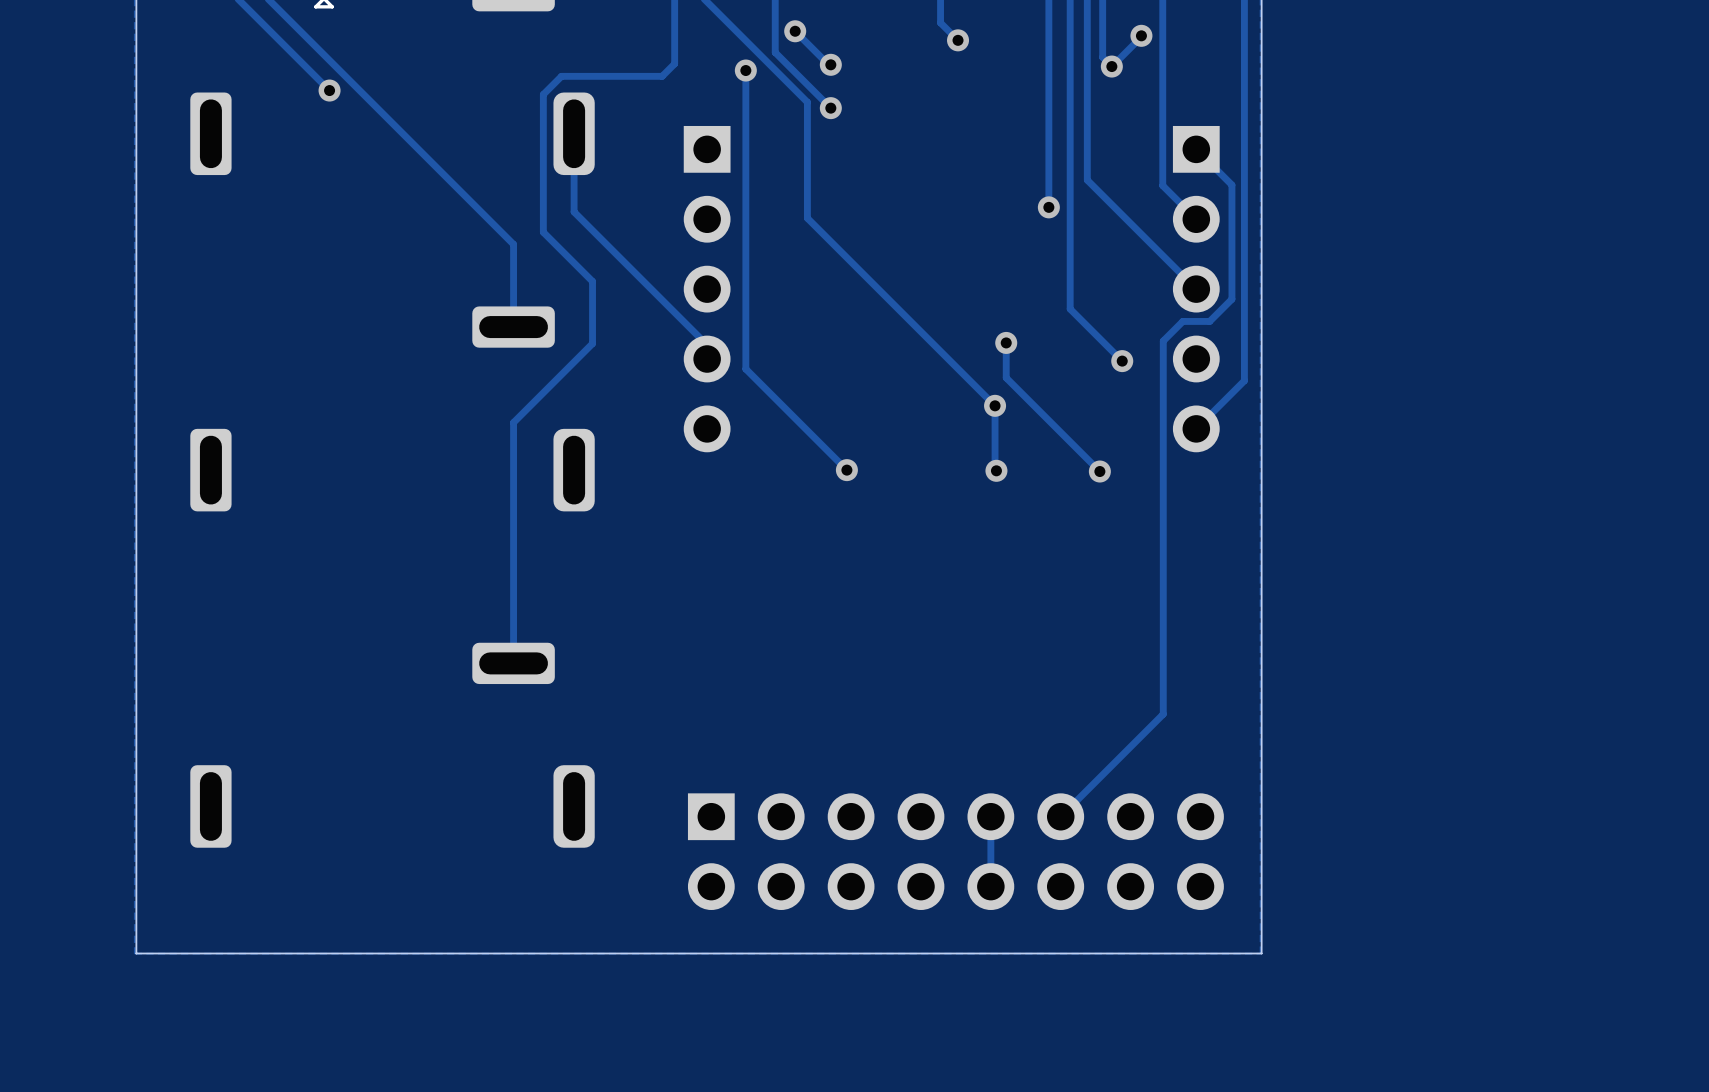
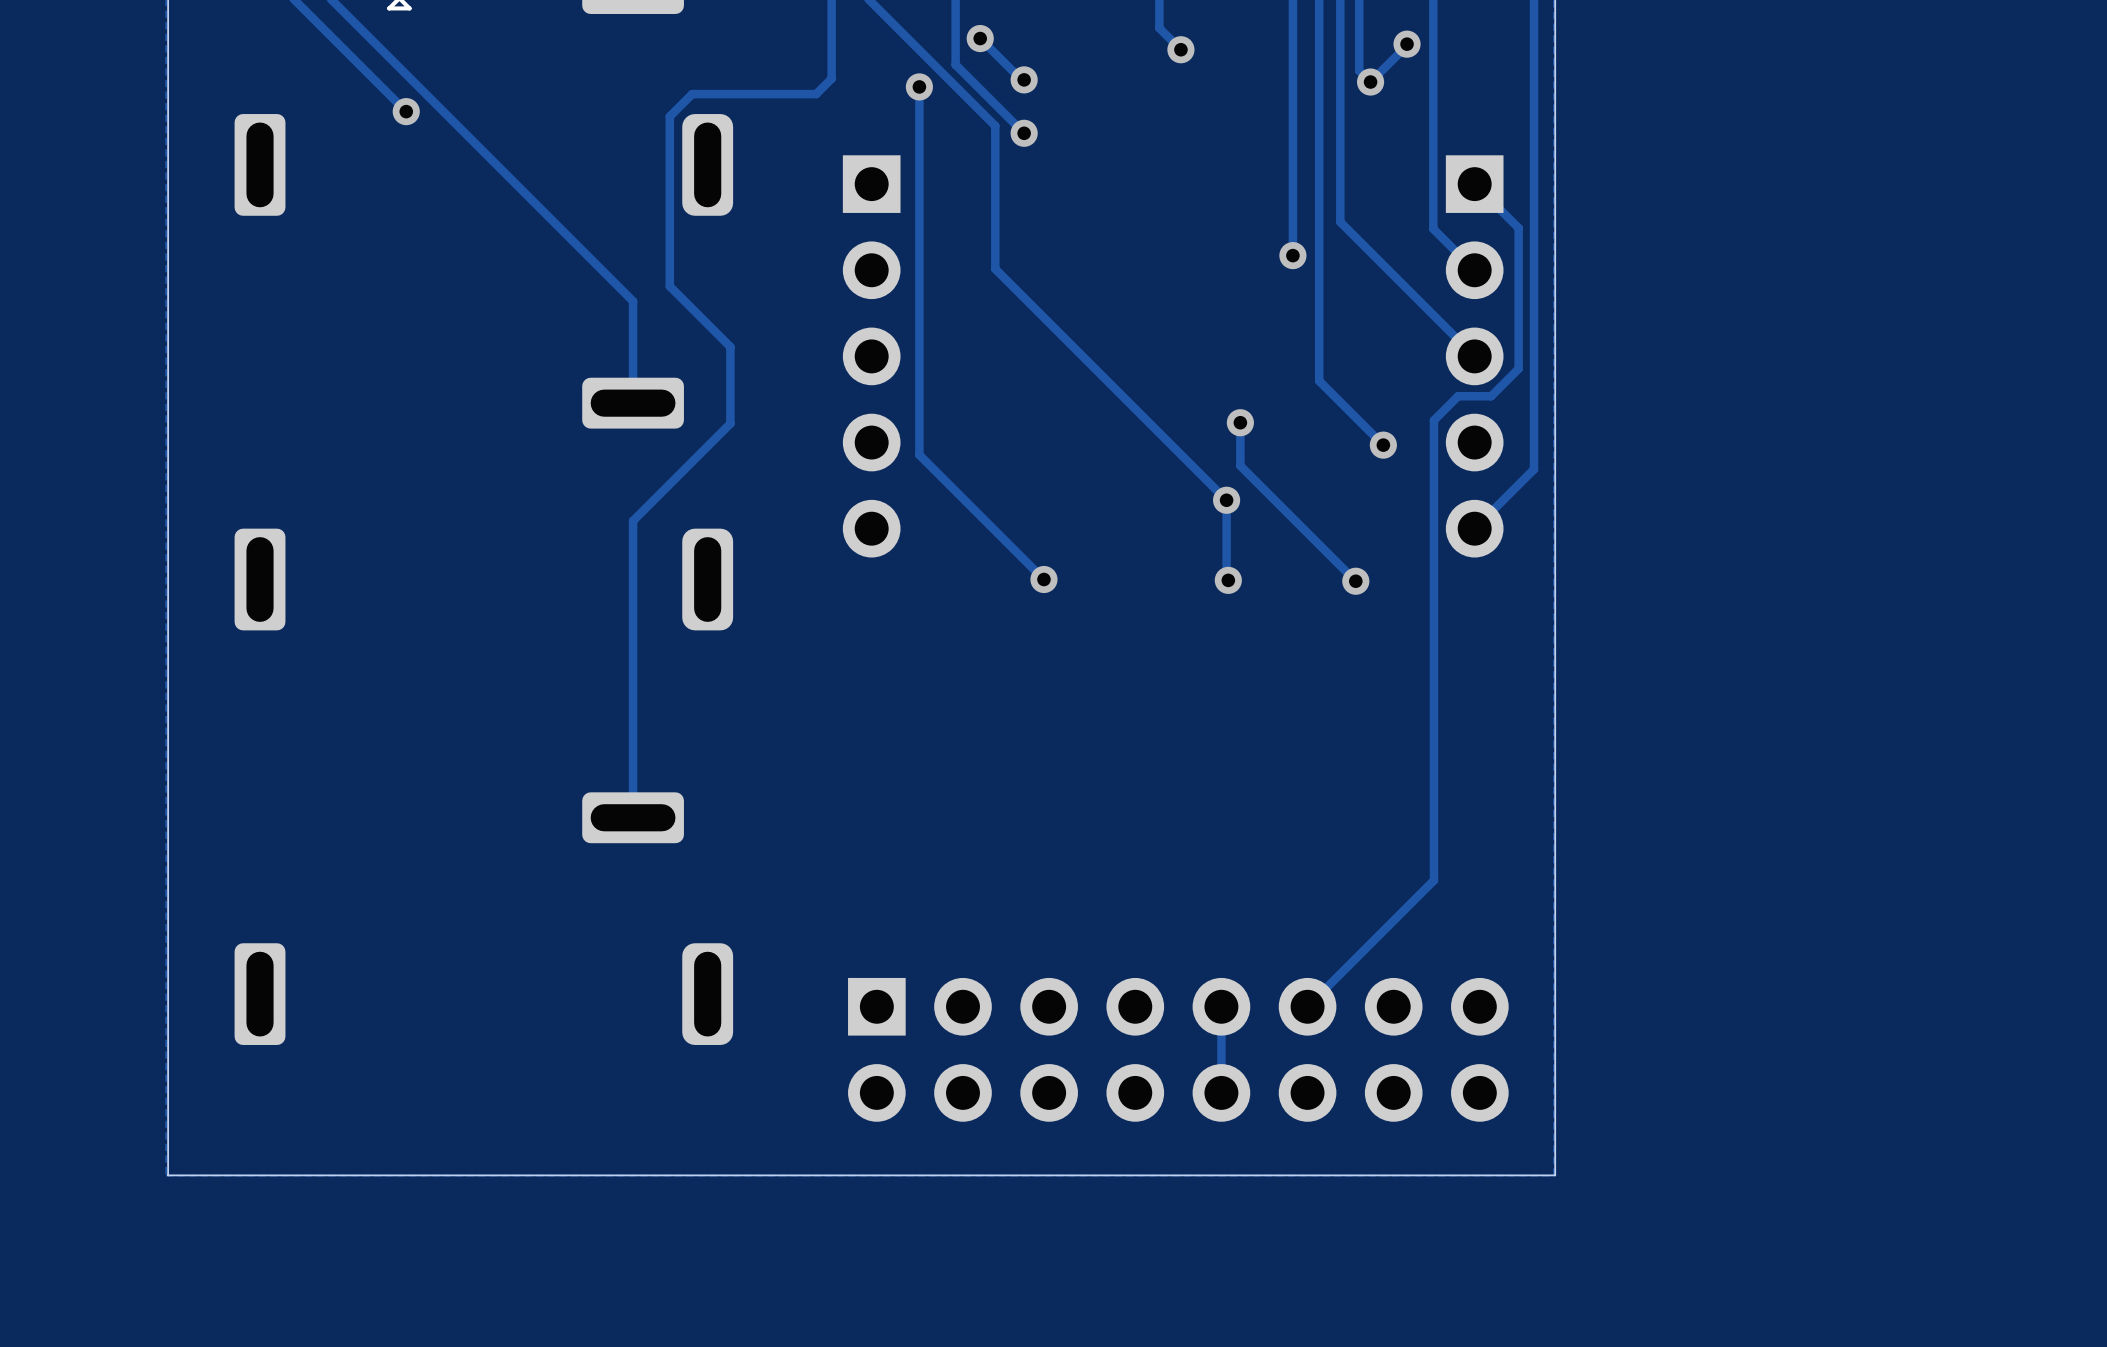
track: (574, 133) (574, 211) (707, 345) (707, 359) -> none

